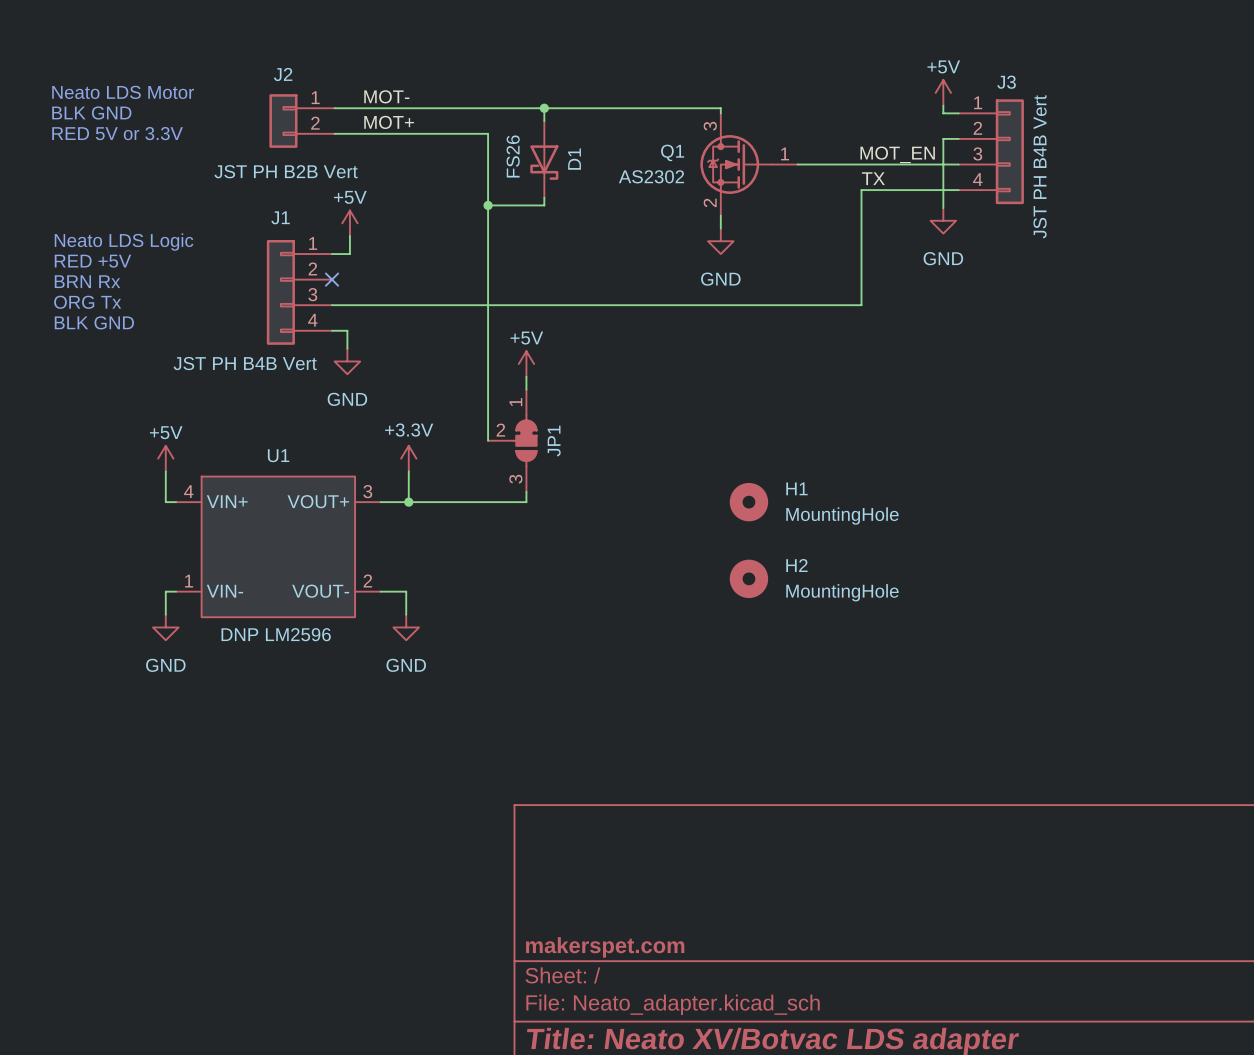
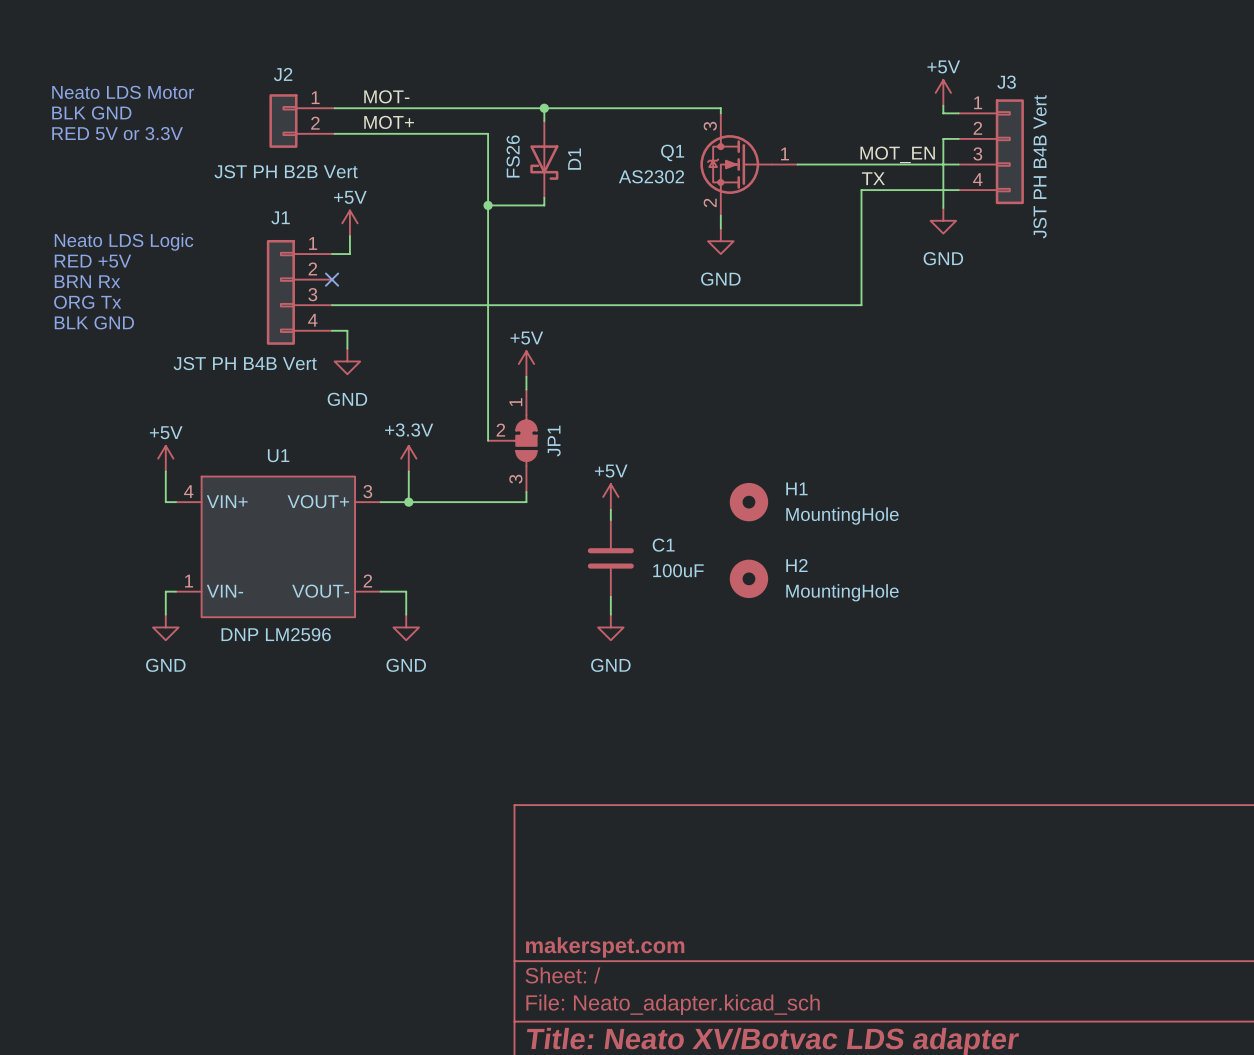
power symbol: none -> +5V (610, 497)
wire: none -> (610, 509) (610, 520)
C1: none -> 100uF (610, 558)
wire: none -> (610, 596) (610, 614)
power symbol: none -> GND (610, 627)

